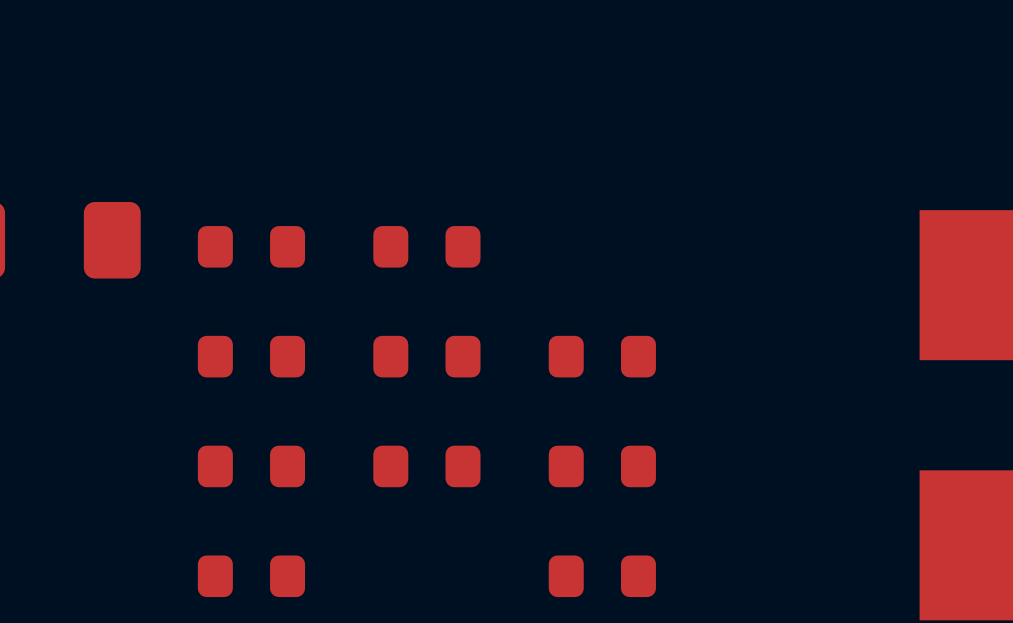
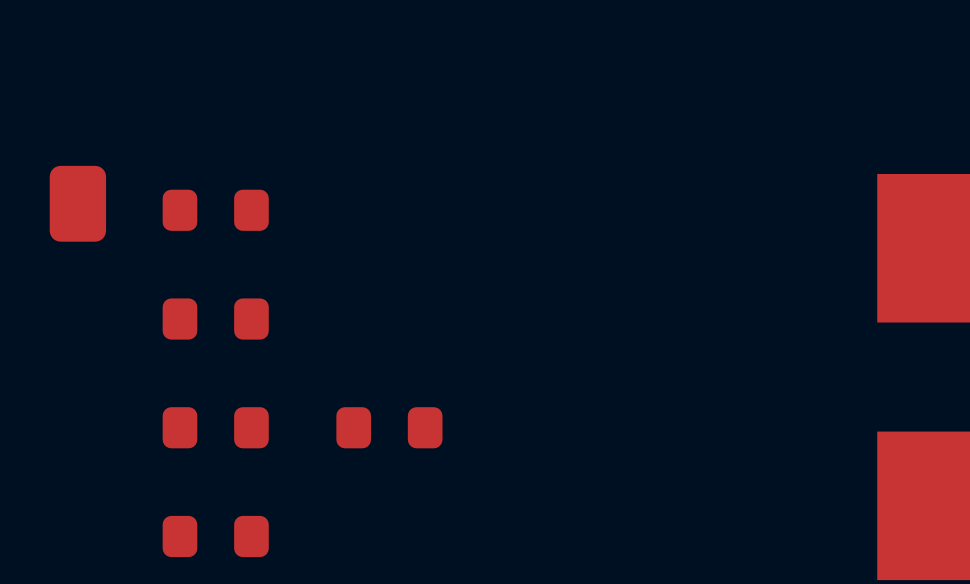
part: (426, 246) -> none
part: (426, 356) -> none
part: (602, 356) -> none
part: (602, 466) -> none
part: (602, 576) -> none

